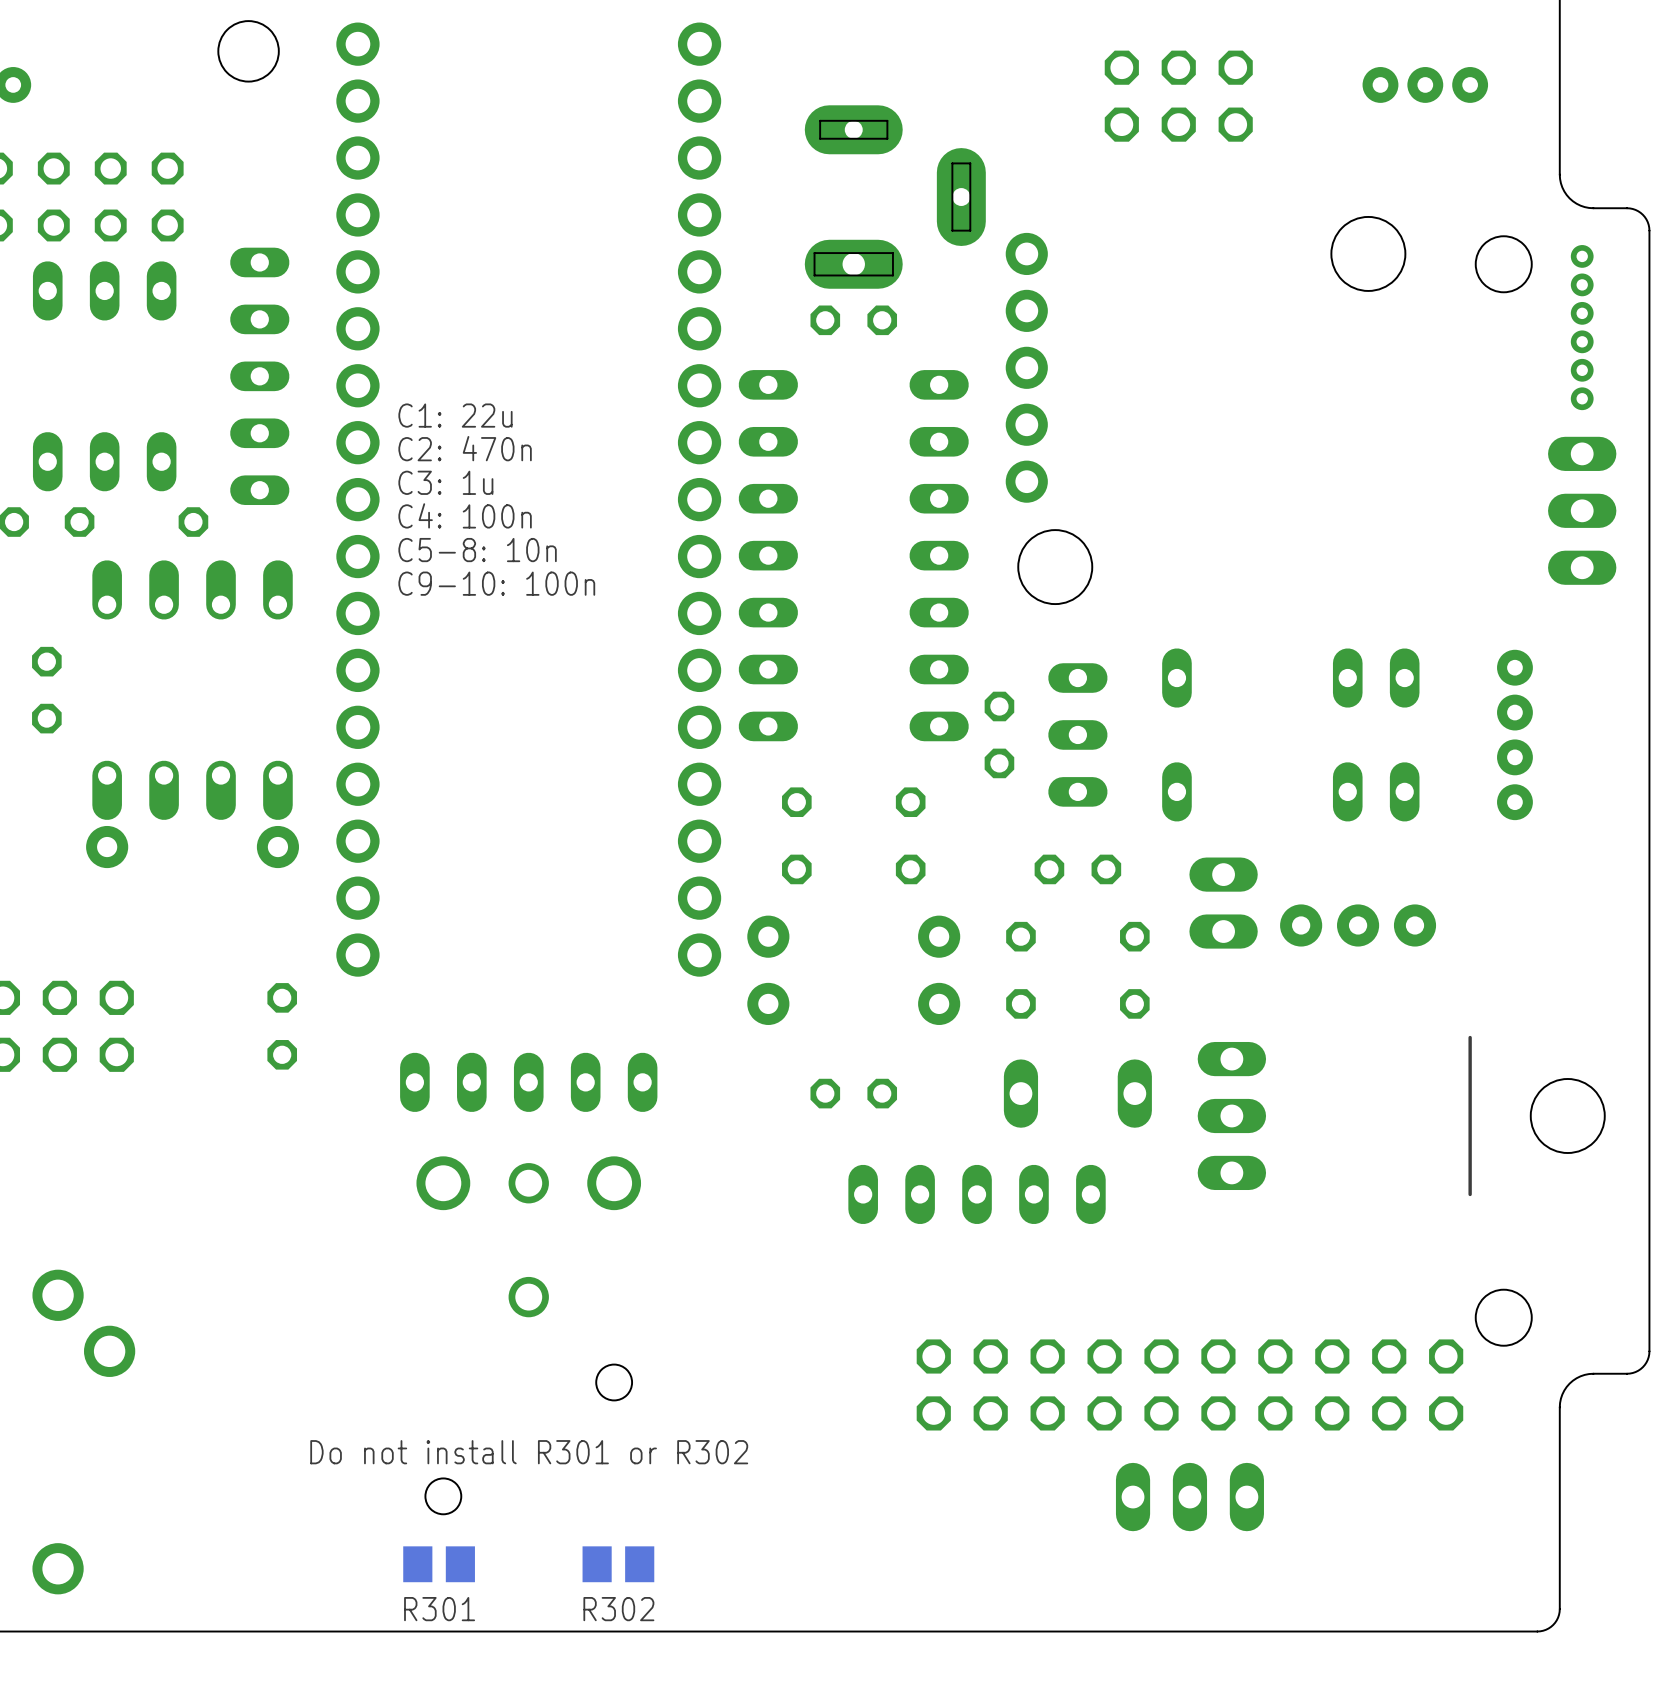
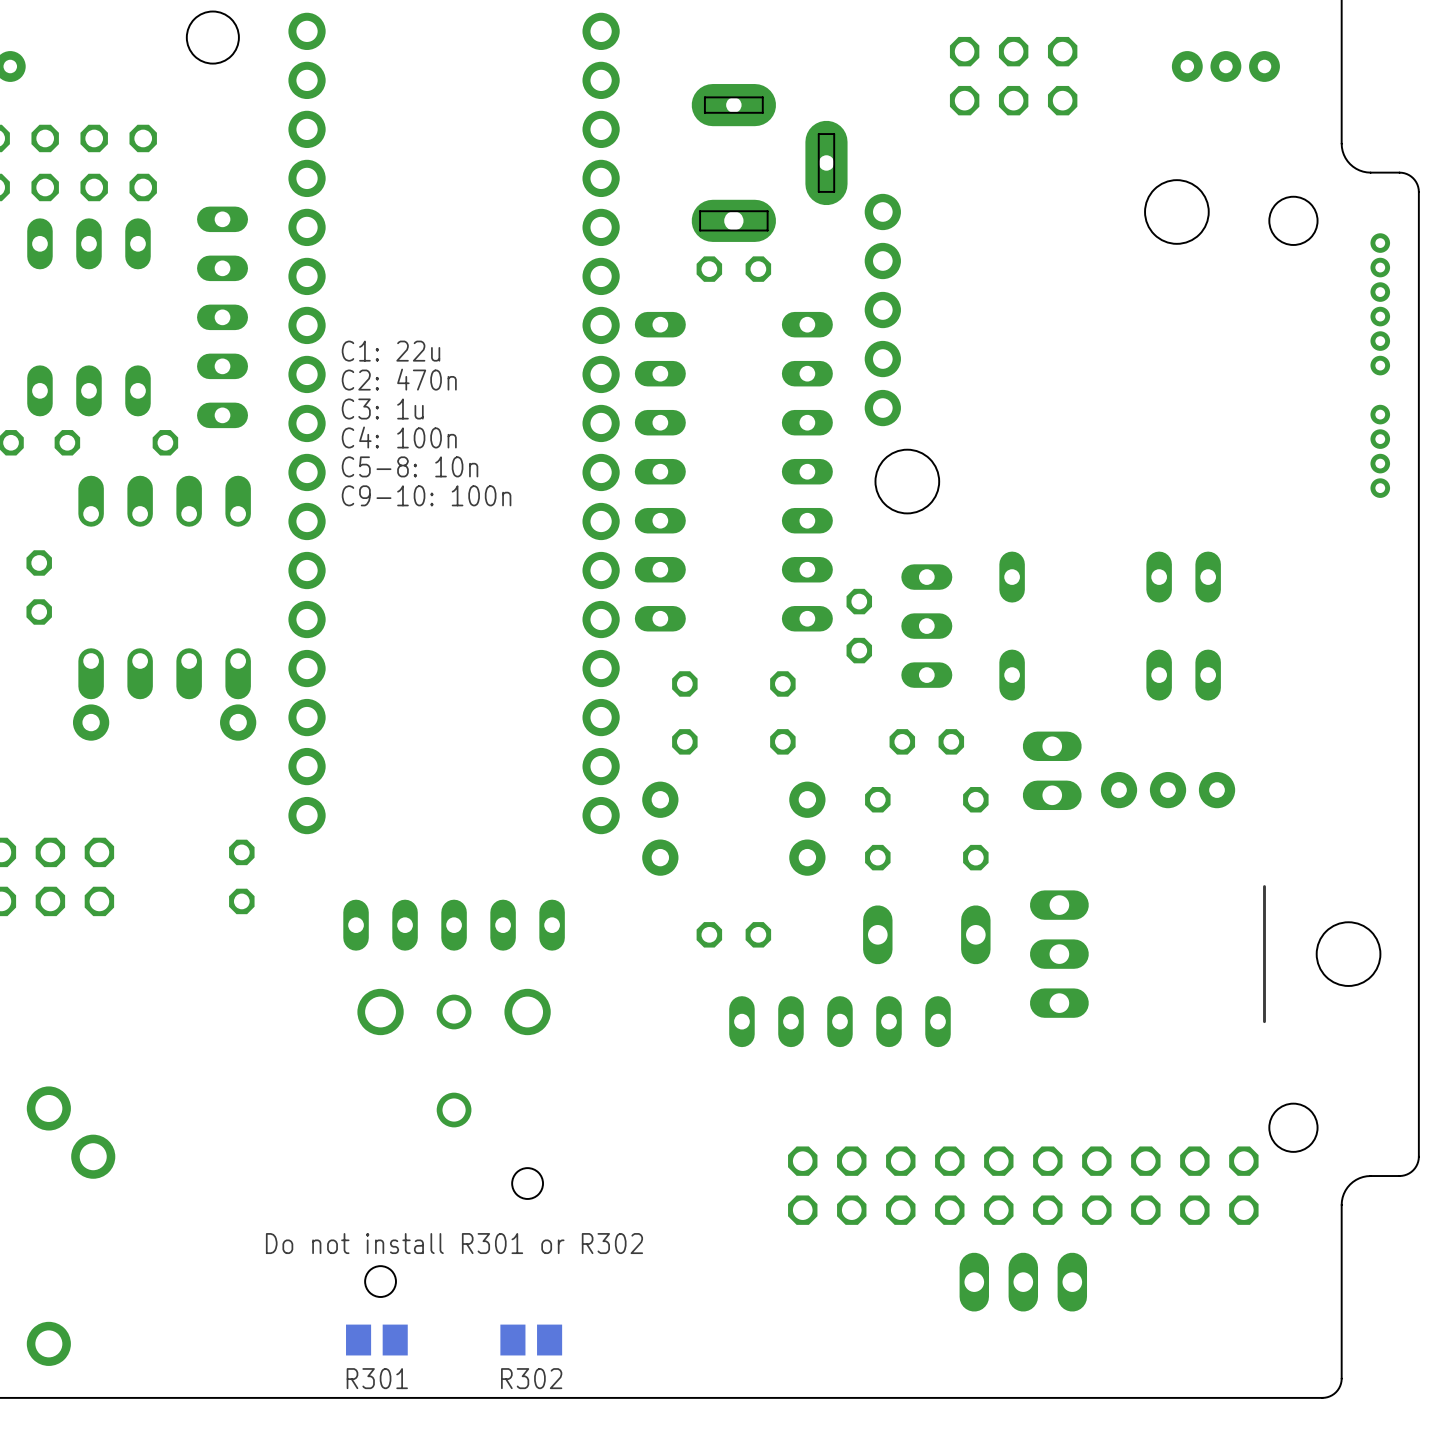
part position: (1582, 327) -> (1380, 304)
part: (1582, 510) -> none
part: none -> (1380, 451)
part: (1514, 734) -> none

